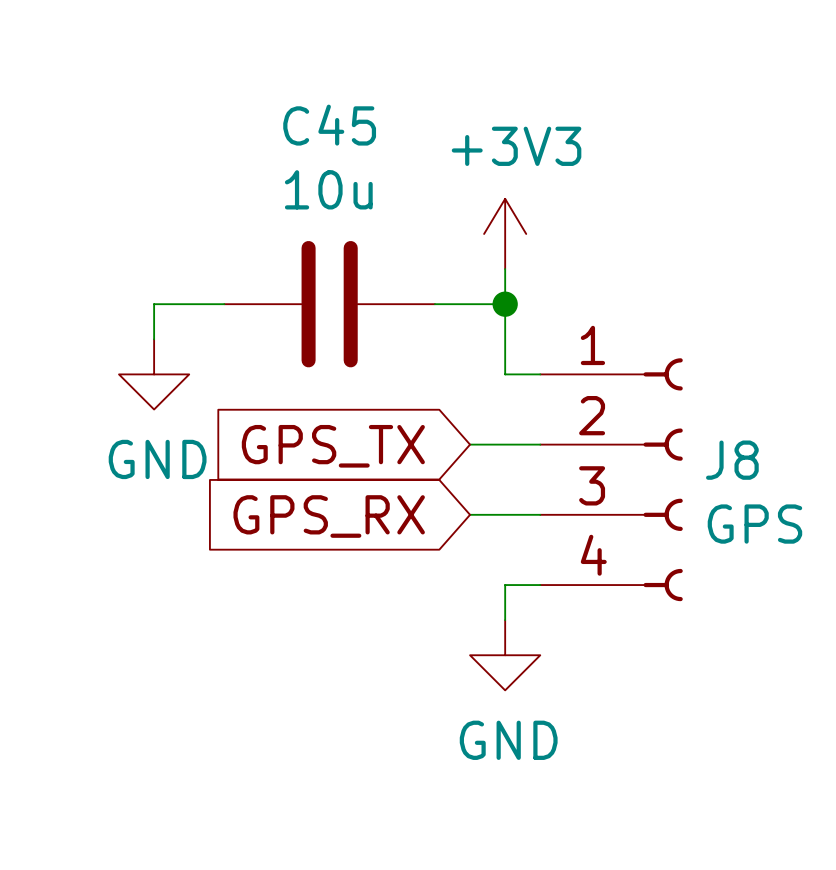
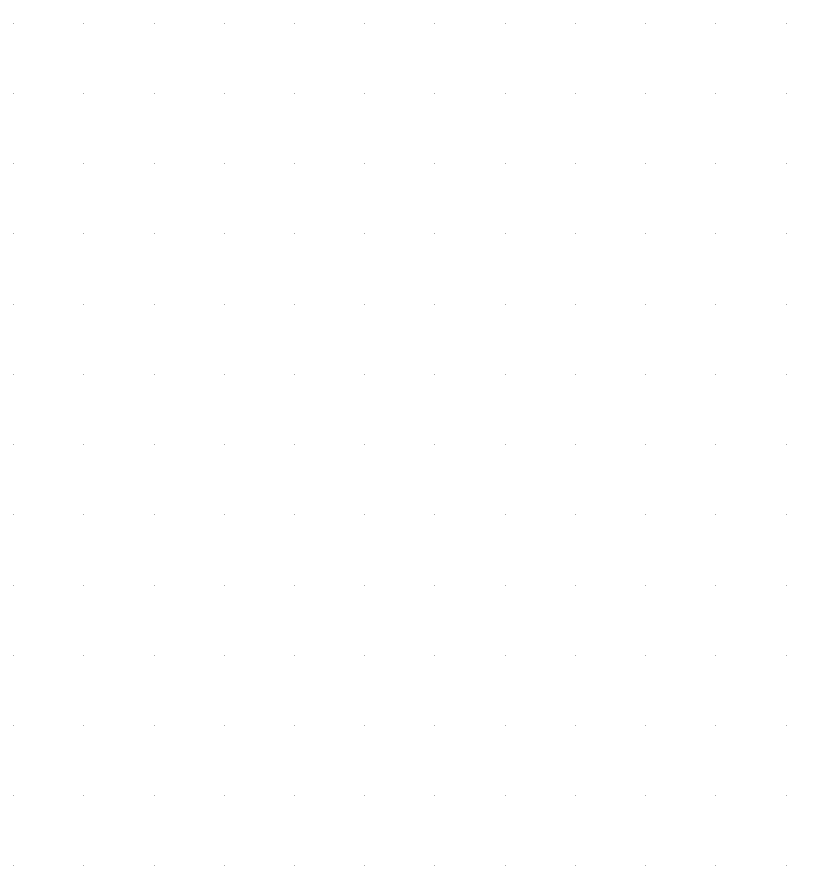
power symbol: +3V3 (505, 233) -> none
wire: (505, 269) (505, 374) (540, 374) -> none
wire: (224, 304) (154, 304) (154, 339) -> none
C45: 10u (329, 304) -> none
wire: (434, 304) (505, 304) -> none
junction: (505, 304) -> none
power symbol: GND (154, 374) -> none
wire: (470, 444) (540, 444) -> none
global label: GPS_TX (333, 446) -> none
J8: GPS (611, 479) -> none
wire: (470, 514) (540, 514) -> none
global label: GPS_RX (329, 516) -> none
wire: (540, 585) (505, 585) (505, 620) -> none
power symbol: GND (505, 655) -> none

